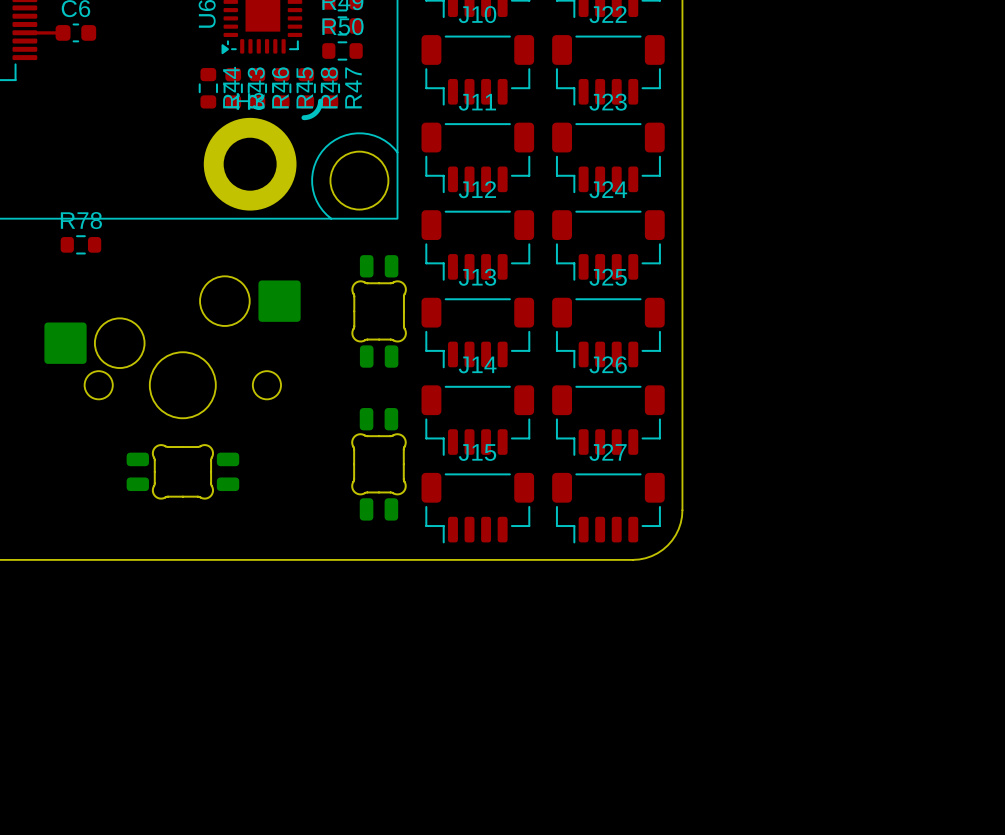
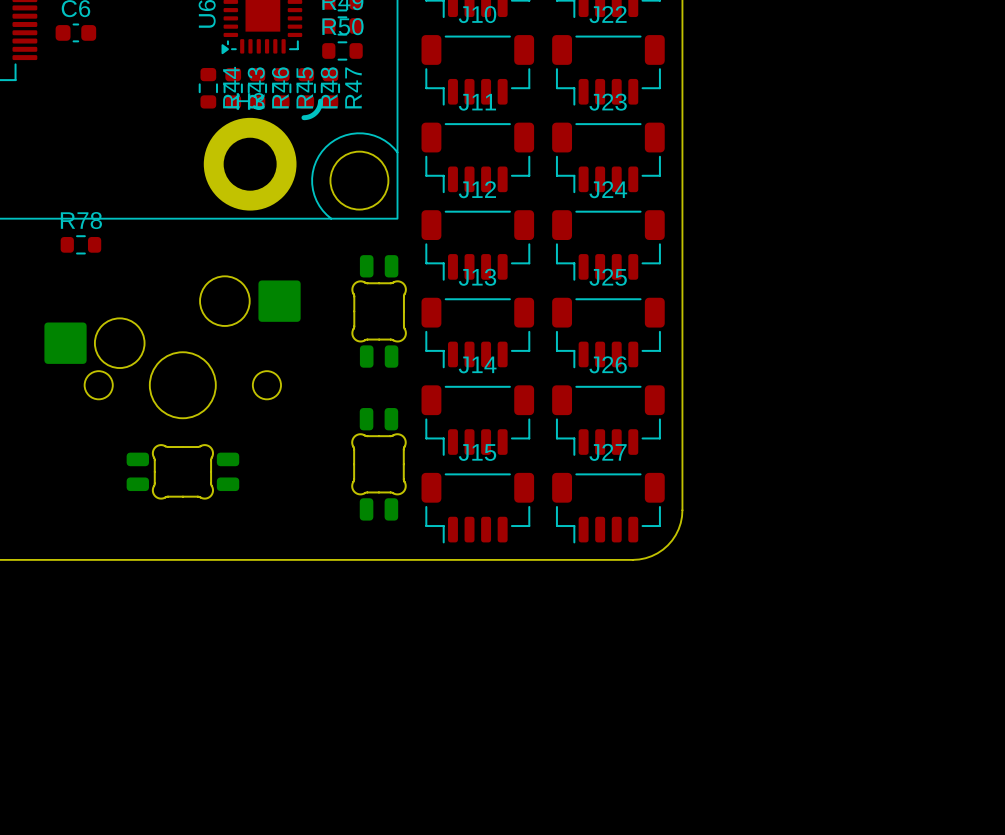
top track: (25, 32) (63, 32) -> none

